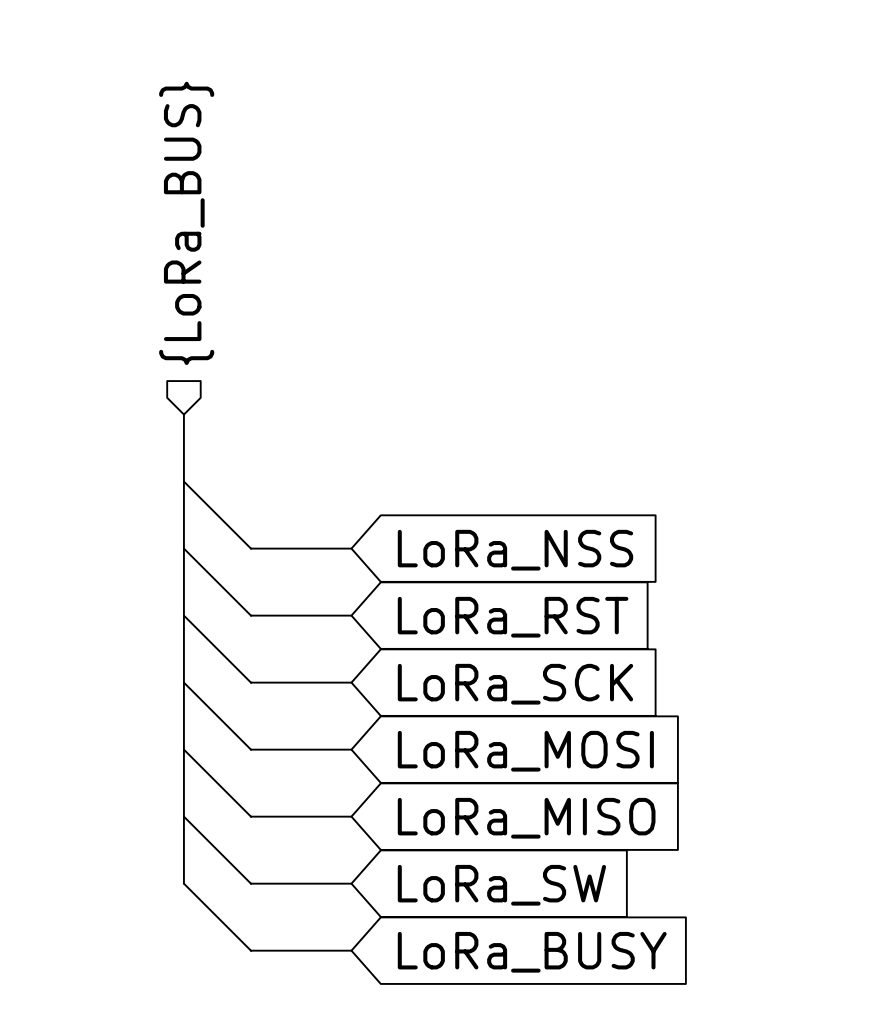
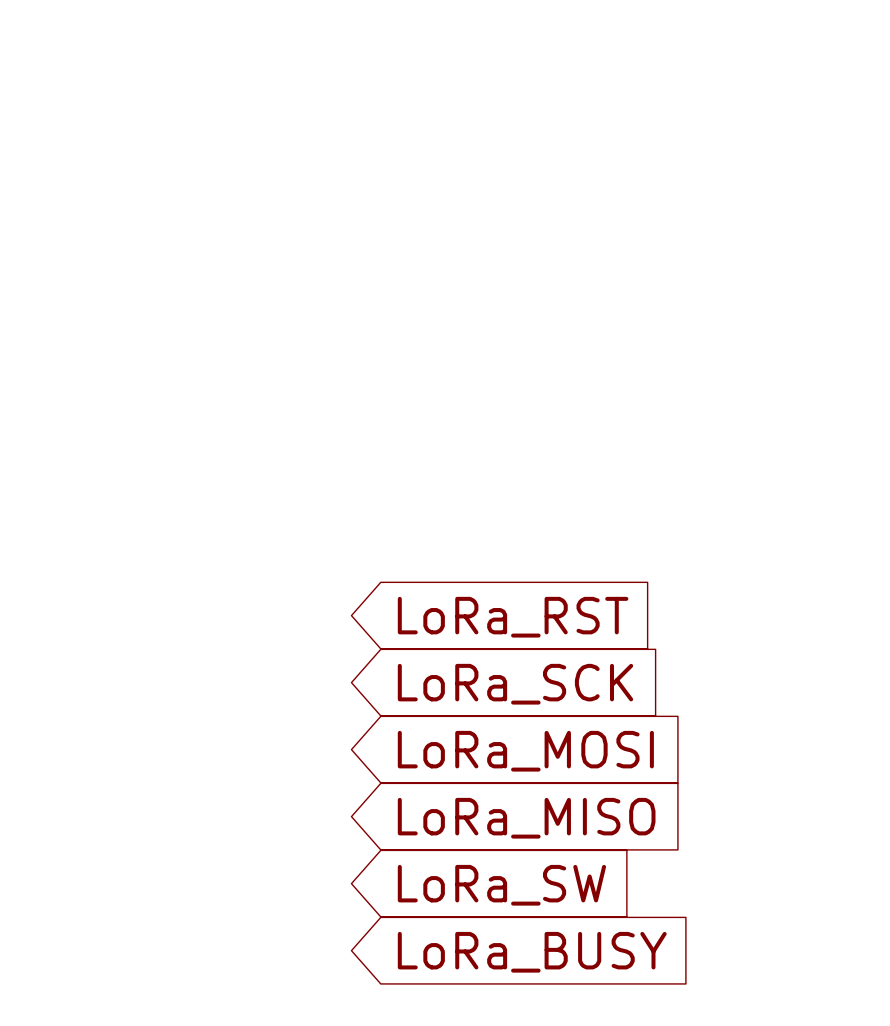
hierarchical label: {LoRa_BUS} (186, 223) -> none
bus: (183, 414) (183, 883) -> none
wire: (183, 481) (250, 548) (351, 548) -> none
wire: (183, 548) (250, 615) (351, 615) -> none
global label: LoRa_NSS (515, 550) -> none
wire: (183, 615) (250, 682) (351, 682) -> none
wire: (183, 682) (250, 749) (351, 749) -> none
wire: (183, 749) (250, 816) (351, 816) -> none
wire: (183, 816) (250, 883) (351, 883) -> none
wire: (183, 883) (250, 950) (351, 950) -> none

